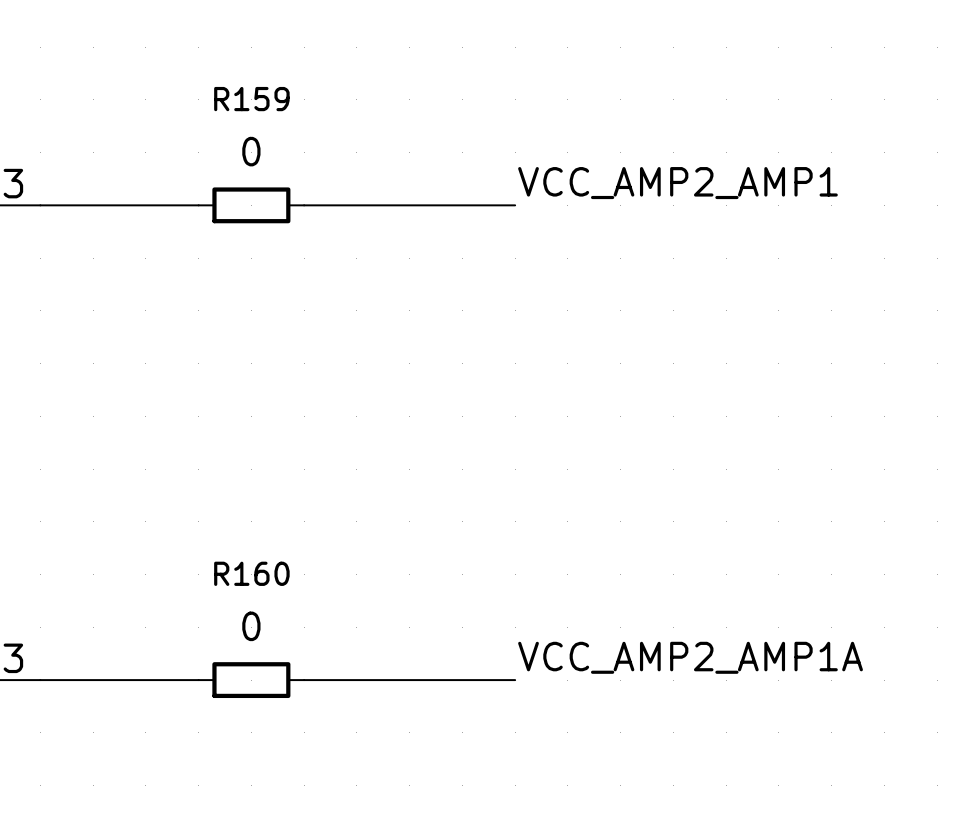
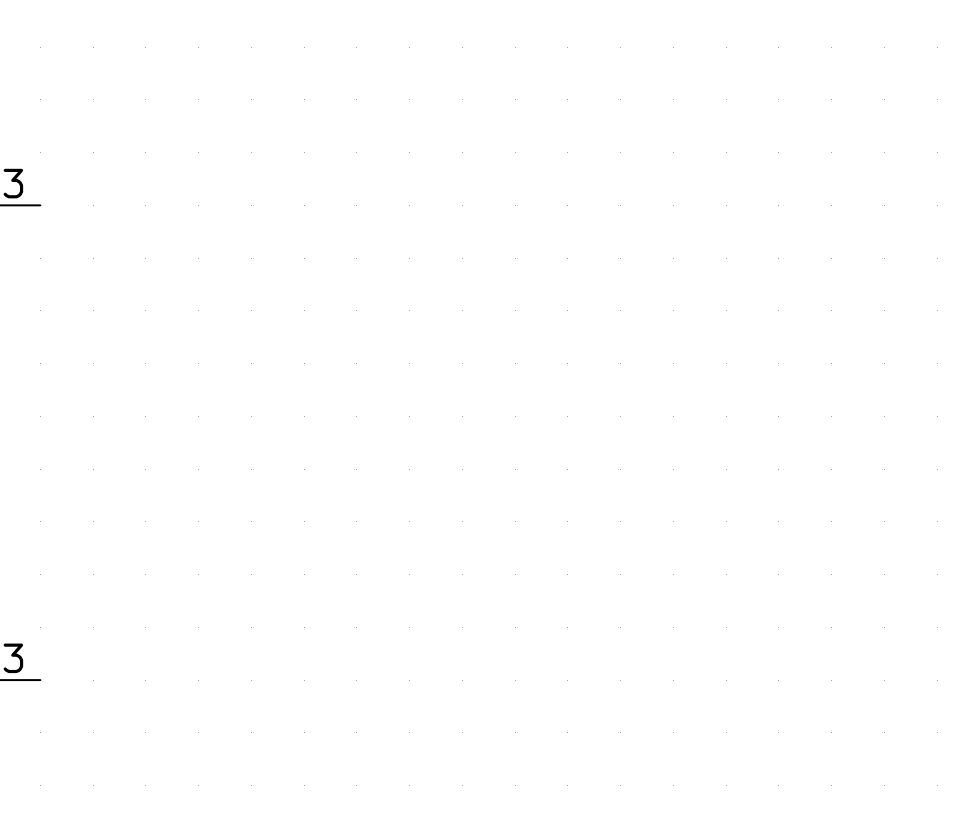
label: VCC_AMP2_AMP1 (677, 183) -> none
wire: (40, 205) (198, 205) -> none
R159: 0 (251, 205) -> none
wire: (304, 205) (515, 205) -> none
label: VCC_AMP2_AMP1A (690, 657) -> none
wire: (40, 680) (198, 680) -> none
R160: 0 (251, 680) -> none
wire: (304, 680) (515, 680) -> none

